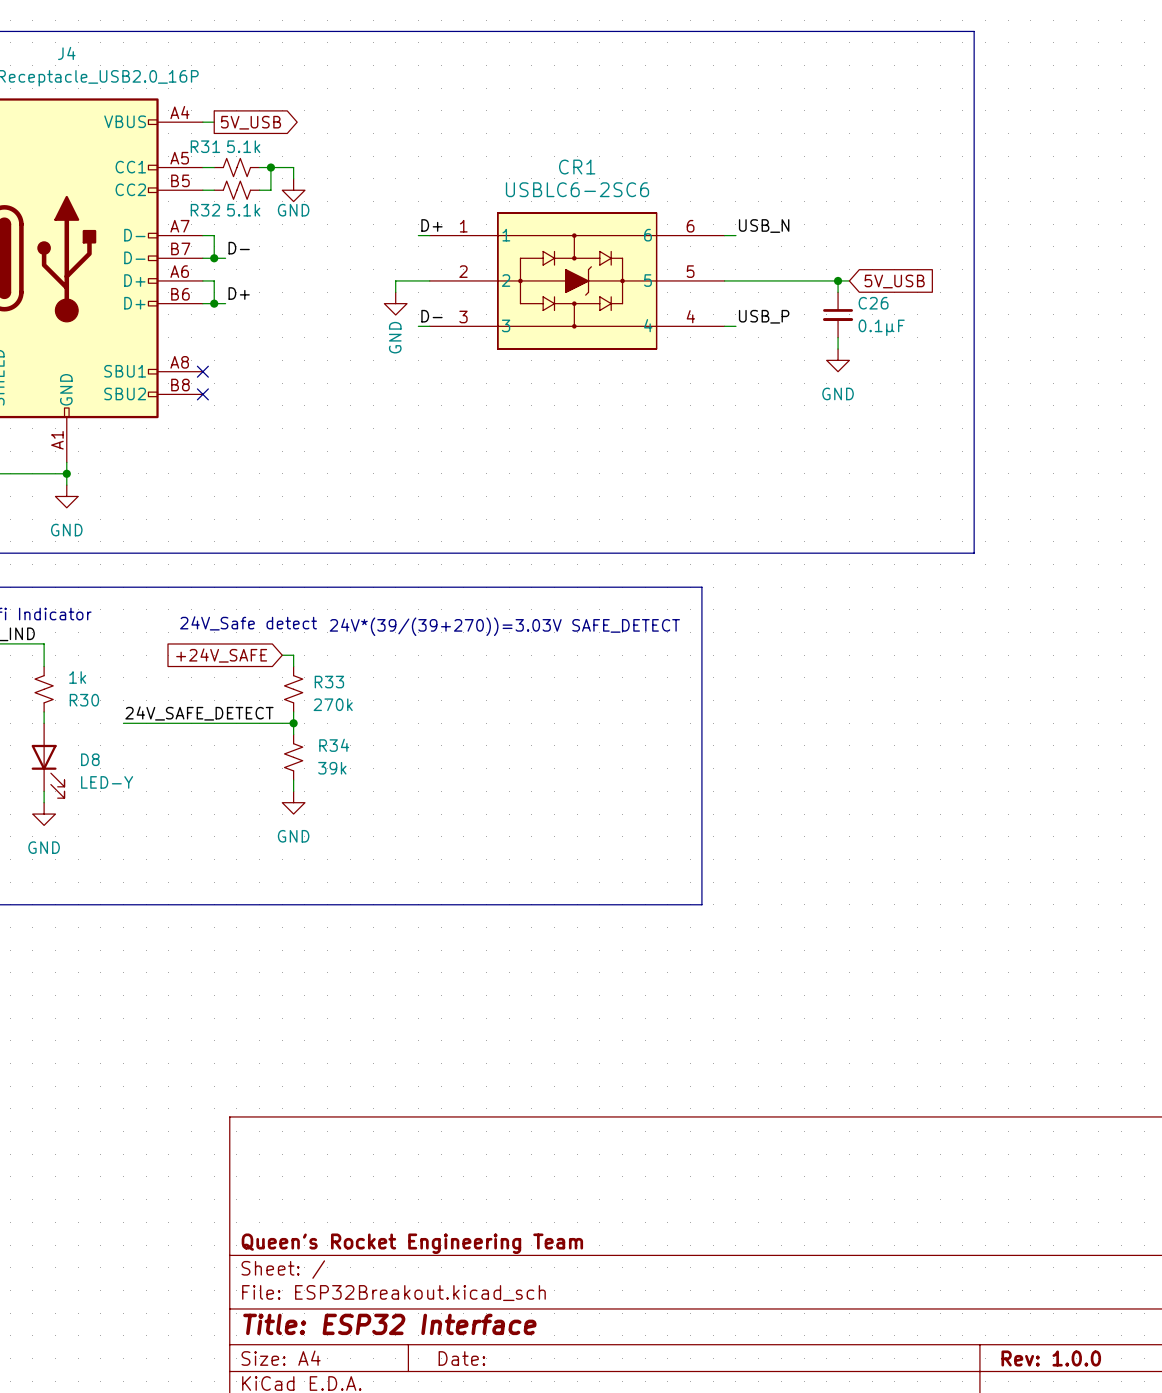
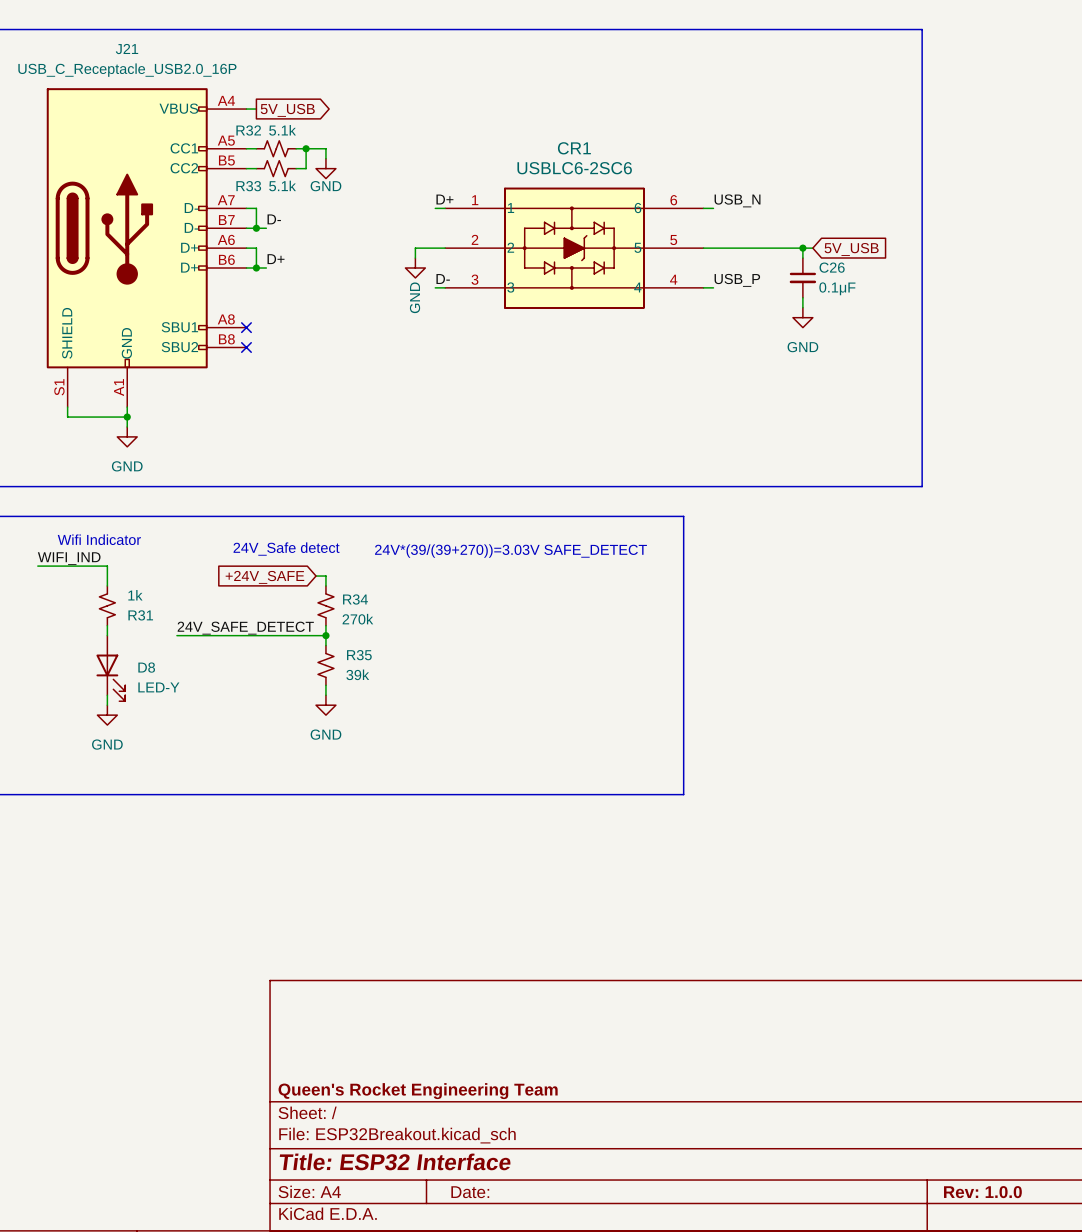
J4 name: J4 (66, 53) -> J21 (127, 49)
R31 name: R31 (205, 146) -> R32 (248, 130)
R32 name: R32 (205, 210) -> R33 (248, 186)
R33 name: R33 (329, 682) -> R34 (355, 599)
R30 name: R30 (84, 700) -> R31 (140, 615)
R34 name: R34 (334, 745) -> R35 (359, 655)

